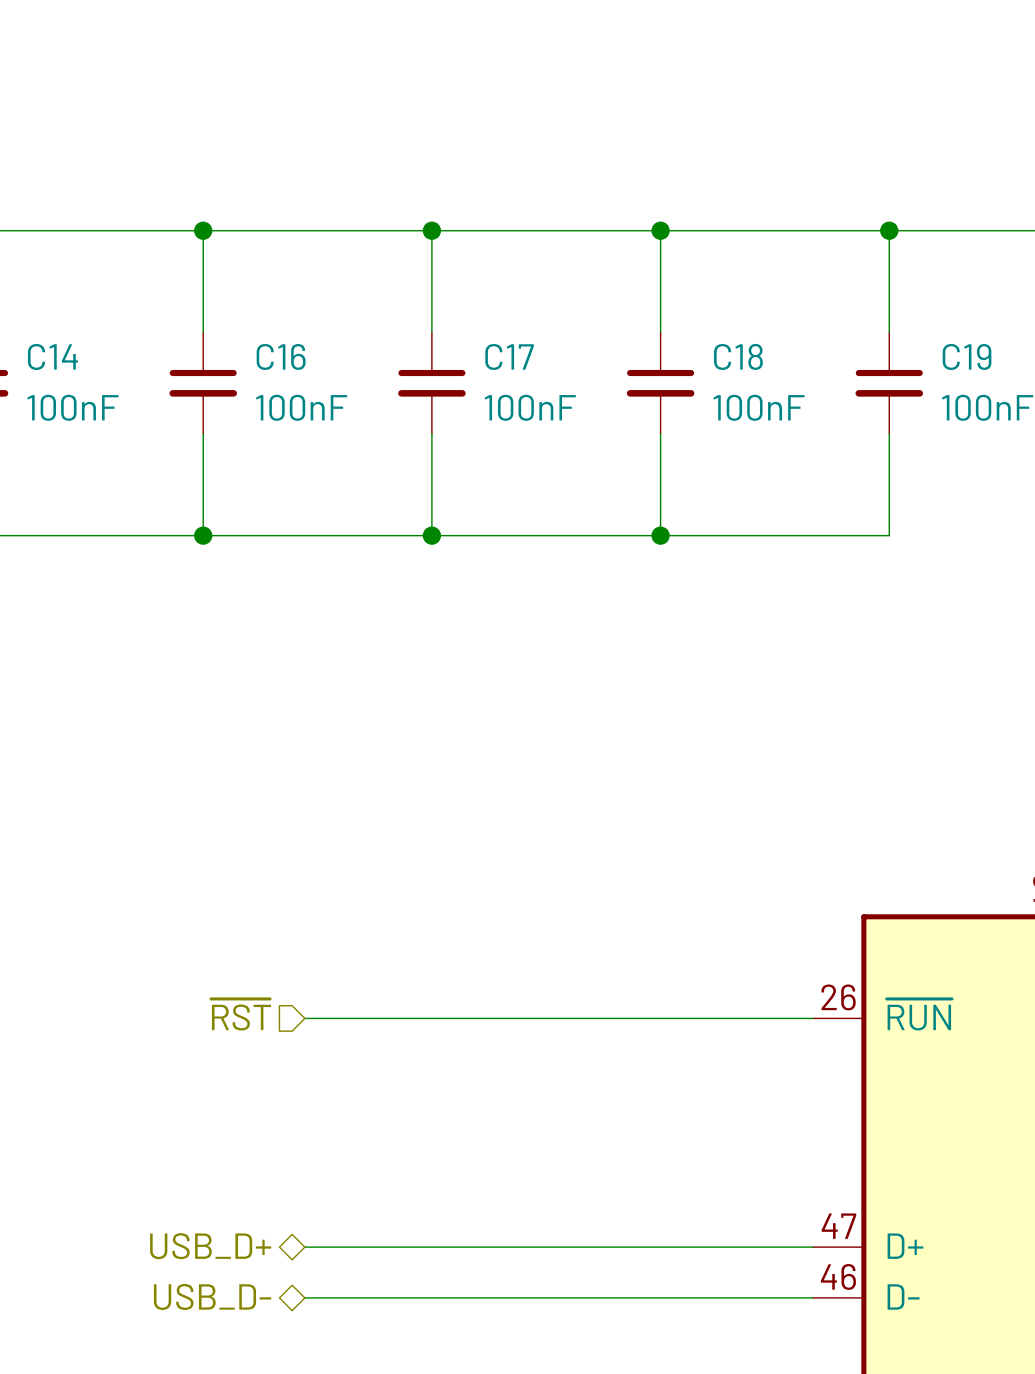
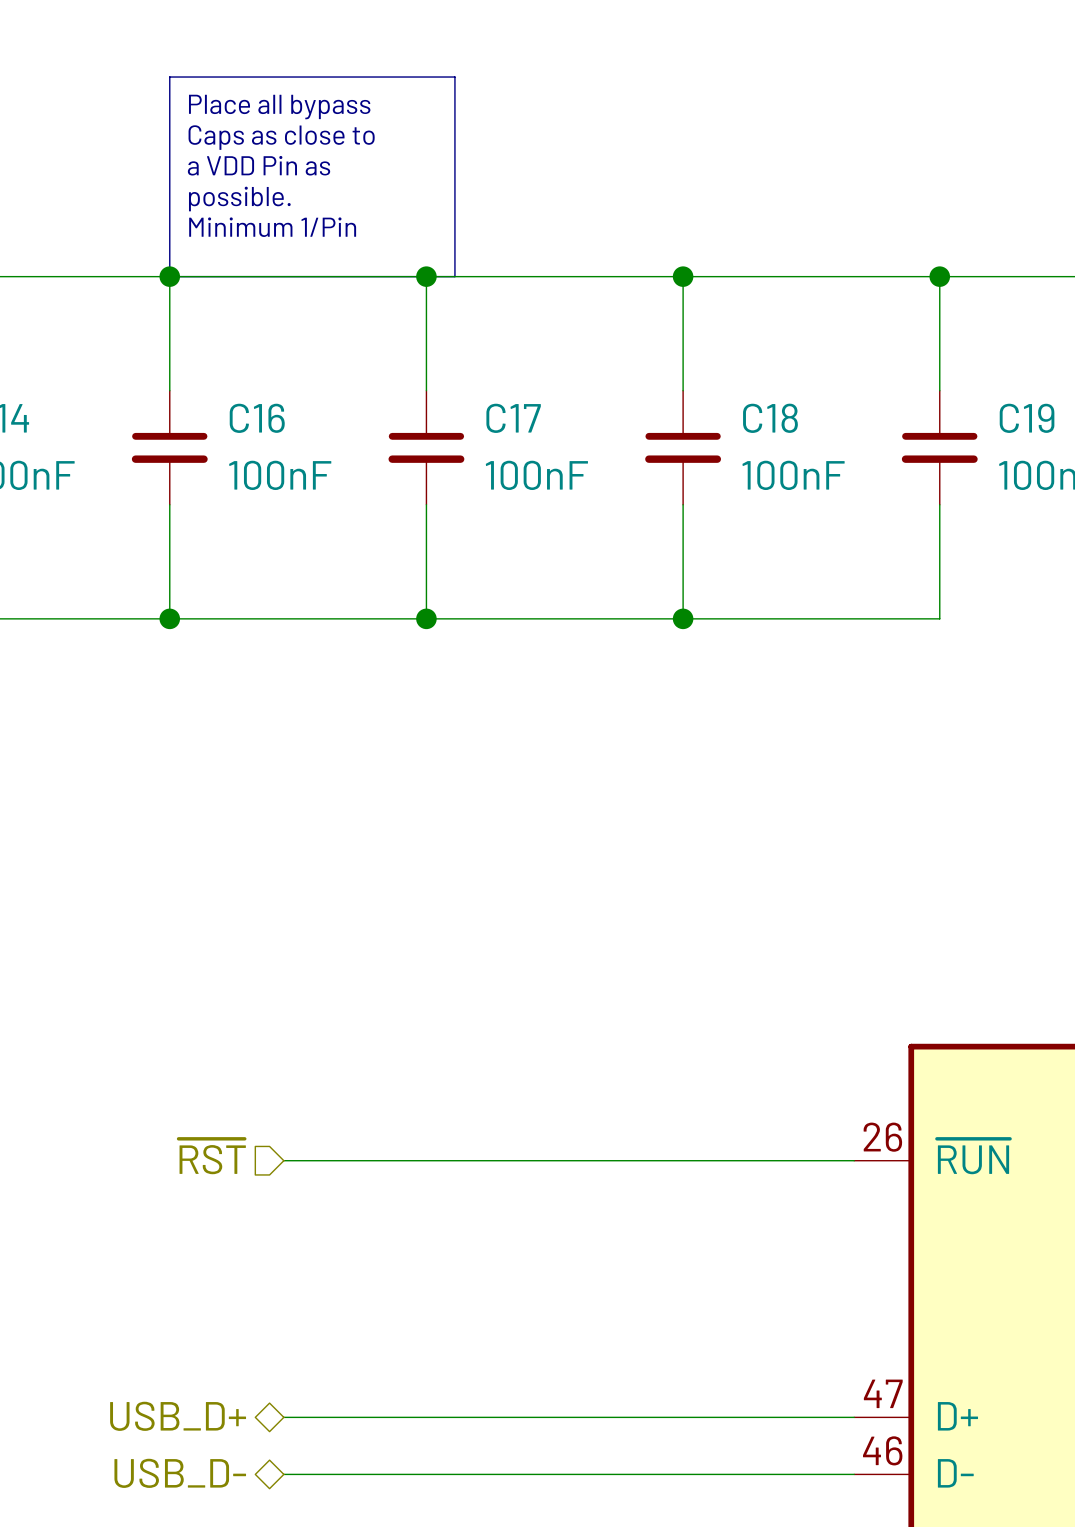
line: none -> (169, 77) (454, 77) (454, 276) (169, 276) (169, 77)
text: none -> Place all bypass (279, 107)
text: none -> Caps as close to (281, 137)
text: none -> a VDD Pin as (259, 165)
text: none -> possible. (239, 199)
text: none -> Minimum 1/Pin (272, 227)

